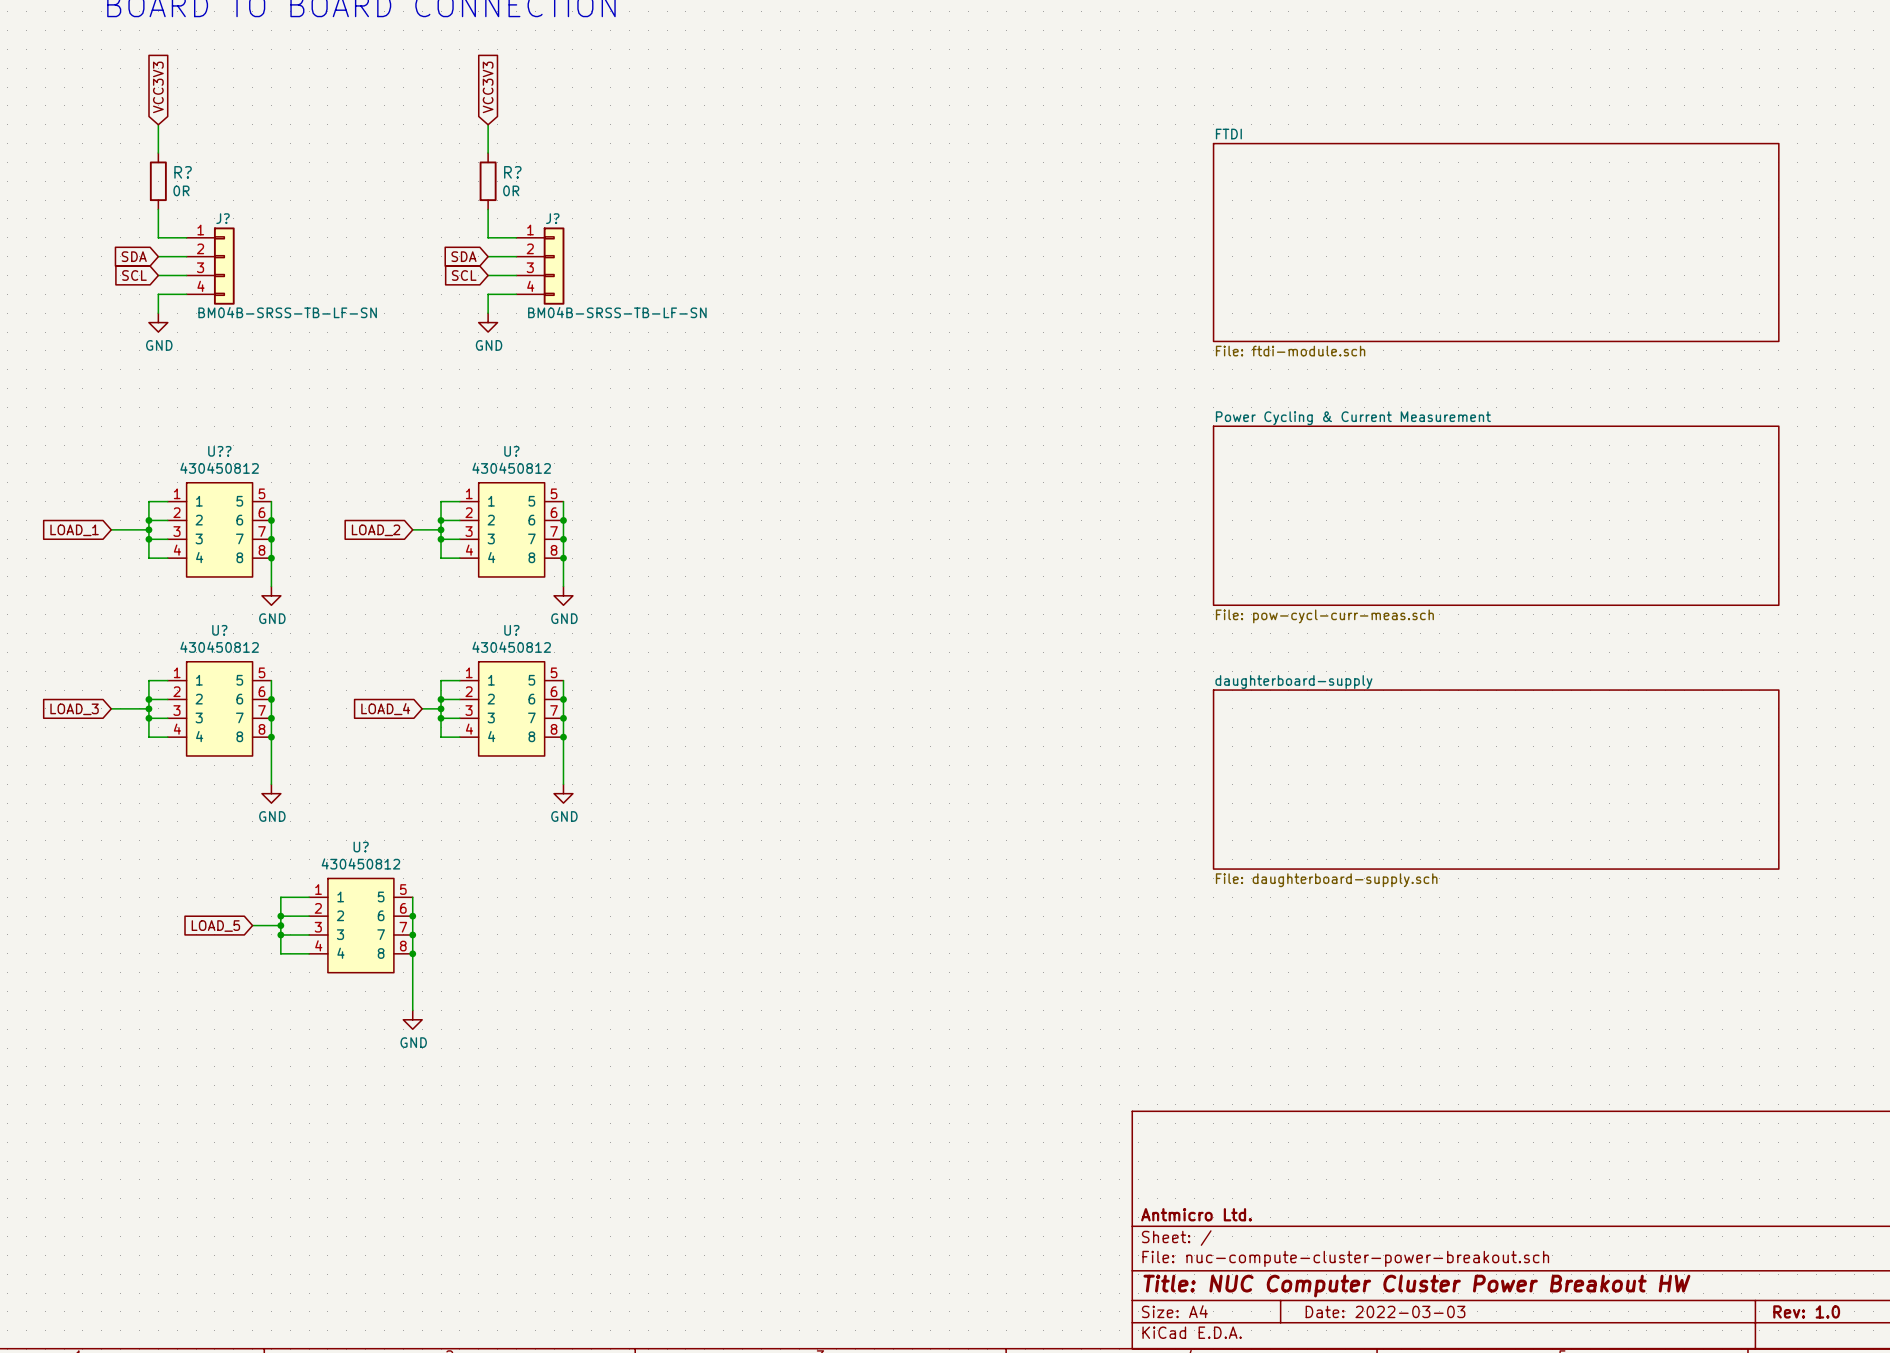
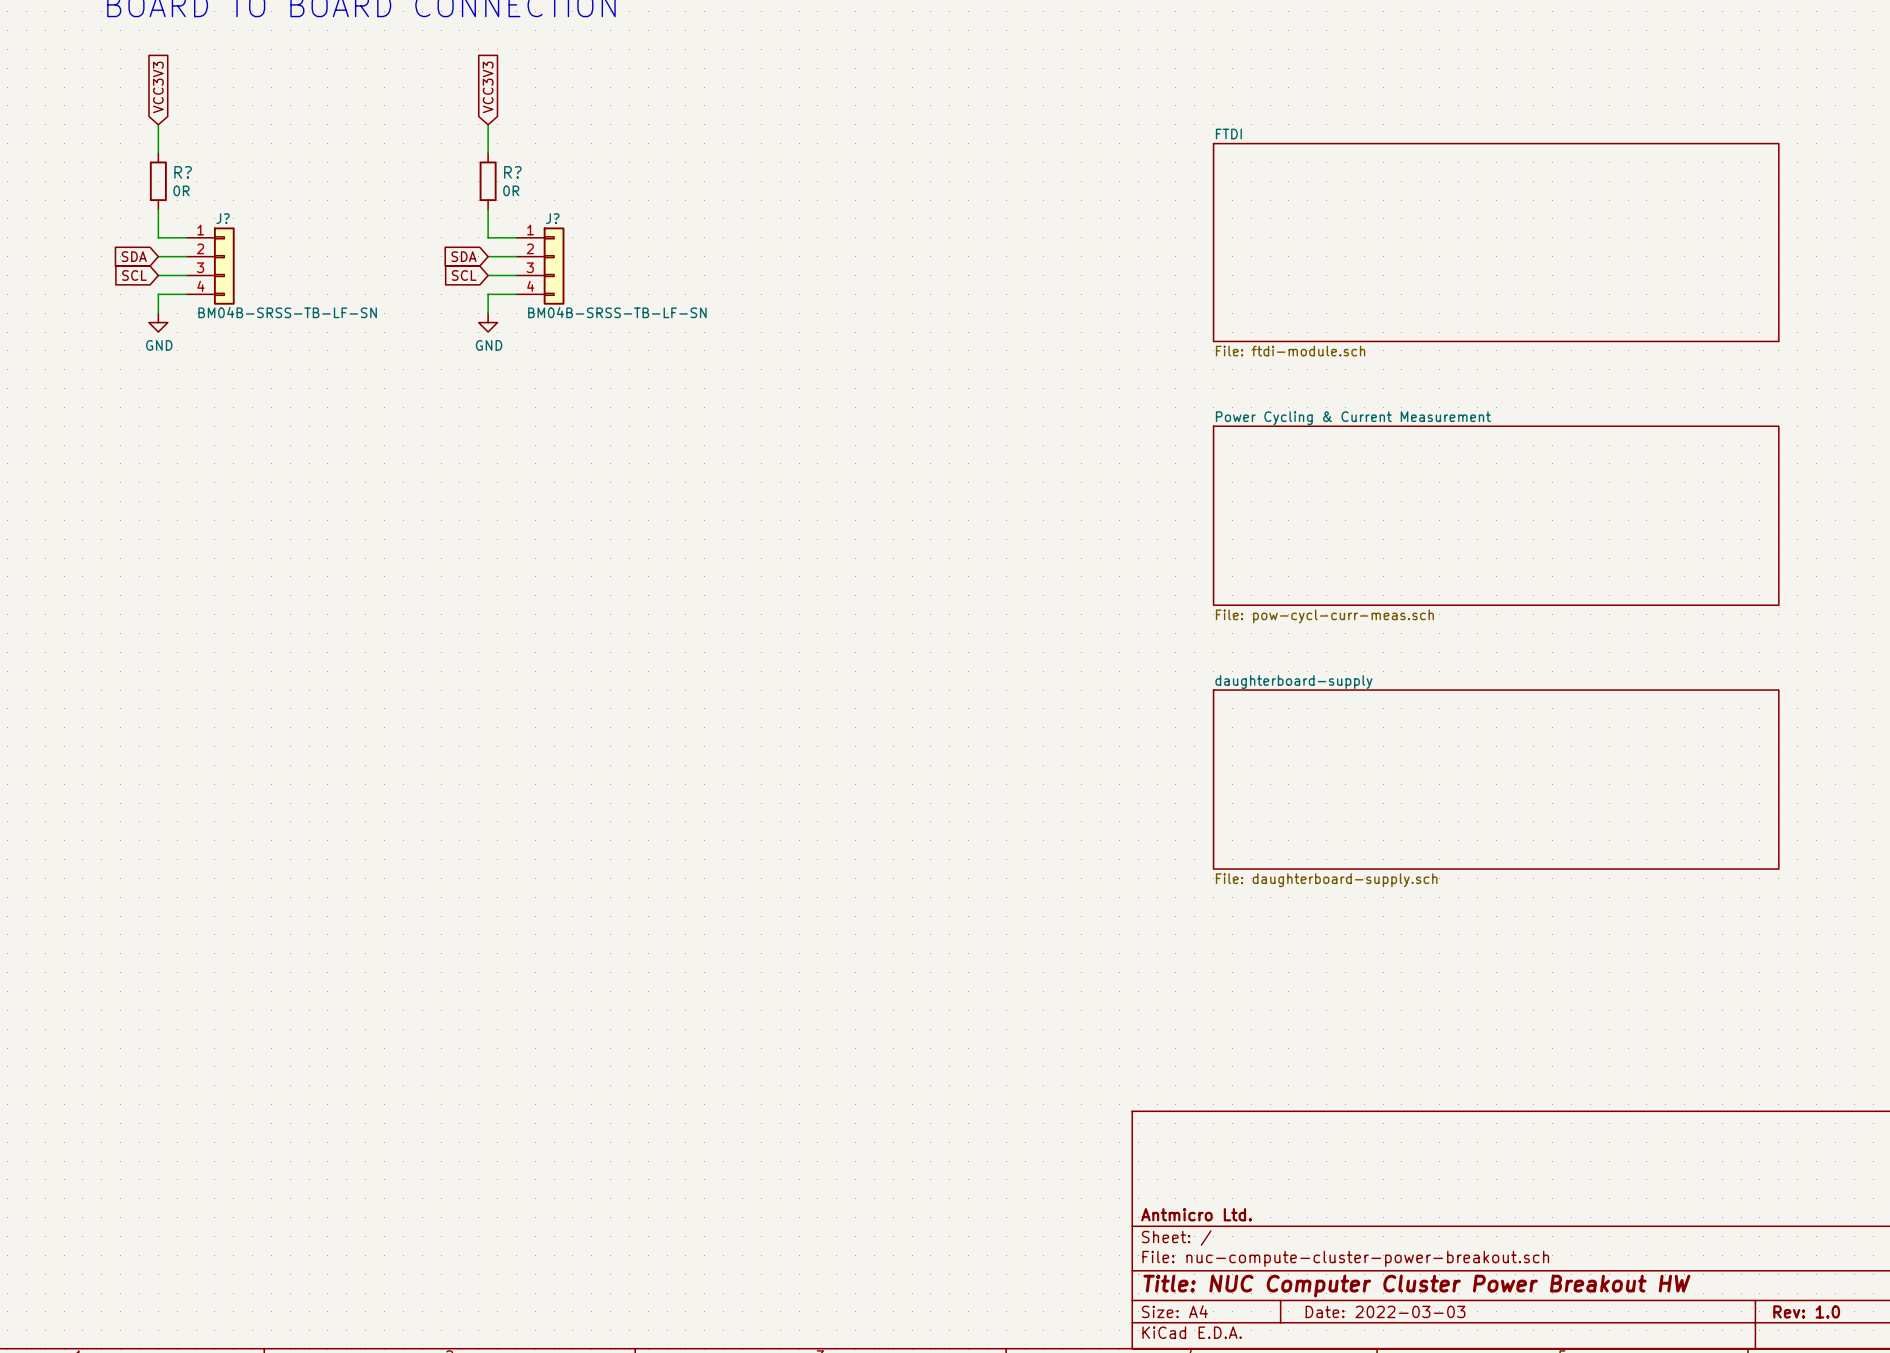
wire: (167, 501) (148, 501) (148, 558) (167, 558) -> none
wire: (271, 501) (271, 586) -> none
wire: (459, 501) (441, 501) (441, 558) (459, 558) -> none
wire: (563, 501) (563, 586) -> none
wire: (148, 520) (167, 520) -> none
junction: (148, 520) -> none
junction: (271, 520) -> none
wire: (441, 520) (459, 520) -> none
junction: (441, 520) -> none
junction: (563, 520) -> none
wire: (111, 529) (148, 529) -> none
junction: (148, 529) -> none
U??: 430450812 (219, 529) -> none
wire: (412, 529) (441, 529) -> none
junction: (441, 529) -> none
U?: 430450812 (511, 529) -> none
global label: LOAD_1 (74, 530) -> none
global label: LOAD_2 (376, 530) -> none
wire: (148, 539) (167, 539) -> none
junction: (148, 539) -> none
junction: (271, 539) -> none
wire: (441, 539) (459, 539) -> none
junction: (441, 539) -> none
junction: (563, 539) -> none
junction: (271, 558) -> none
junction: (563, 558) -> none
power symbol: GND (271, 595) -> none
power symbol: GND (563, 595) -> none
wire: (167, 680) (148, 680) (148, 737) (167, 737) -> none
wire: (271, 680) (271, 784) -> none
wire: (459, 680) (441, 680) (441, 737) (459, 737) -> none
wire: (563, 680) (563, 784) -> none
wire: (148, 699) (167, 699) -> none
junction: (148, 699) -> none
junction: (271, 699) -> none
wire: (441, 699) (459, 699) -> none
junction: (441, 699) -> none
junction: (563, 699) -> none
wire: (111, 708) (148, 708) -> none
junction: (148, 708) -> none
U?: 430450812 (219, 708) -> none
wire: (422, 708) (441, 708) -> none
junction: (441, 708) -> none
U?: 430450812 (511, 708) -> none
global label: LOAD_3 (74, 709) -> none
global label: LOAD_4 (385, 709) -> none
wire: (148, 718) (167, 718) -> none
junction: (148, 718) -> none
junction: (271, 718) -> none
wire: (441, 718) (459, 718) -> none
junction: (441, 718) -> none
junction: (563, 718) -> none
junction: (271, 737) -> none
junction: (563, 737) -> none
power symbol: GND (271, 793) -> none
power symbol: GND (563, 793) -> none
wire: (309, 897) (280, 897) (280, 953) (309, 953) -> none
wire: (412, 897) (412, 1010) -> none
wire: (280, 916) (309, 916) -> none
junction: (280, 916) -> none
junction: (412, 916) -> none
wire: (252, 925) (280, 925) -> none
junction: (280, 925) -> none
U?: 430450812 (360, 925) -> none
global label: LOAD_5 (215, 926) -> none
wire: (280, 934) (309, 934) -> none
junction: (280, 934) -> none
junction: (412, 934) -> none
junction: (412, 953) -> none
power symbol: GND (412, 1019) -> none

